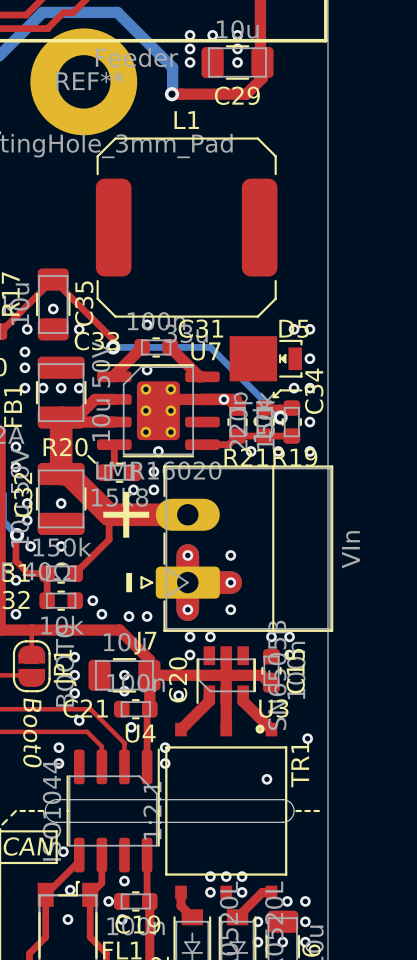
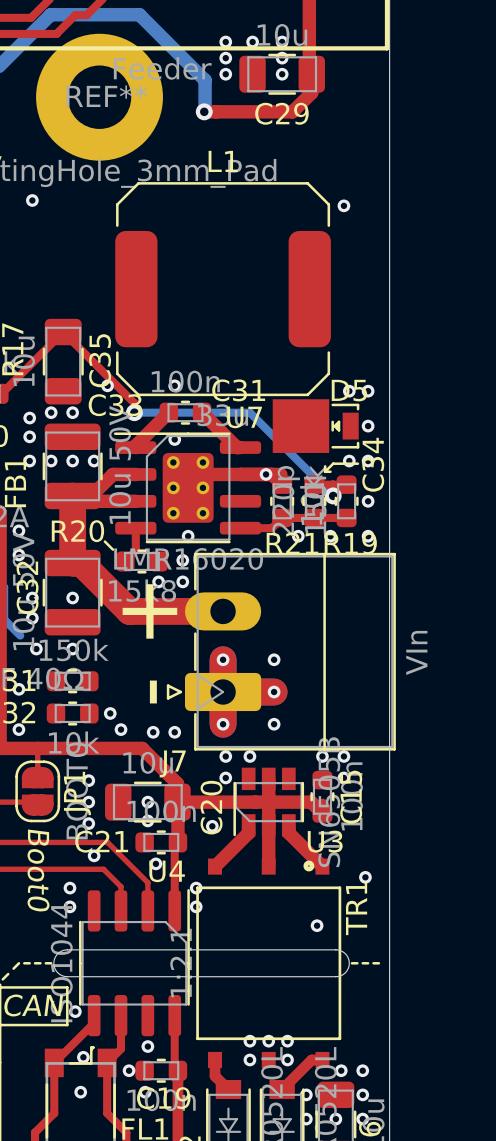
via: none -> (32, 200)
via: none -> (343, 205)
L1 position: (186, 227) -> (223, 289)
via: (53, 308) -> none
via: (27, 329) -> none
via position: (79, 329) -> (107, 385)
via: none -> (51, 412)
via: none -> (72, 412)
top track: (109, 514) (109, 539) (75, 573) -> none
top track: (17, 535) (15, 561) (28, 573) (47, 573) (47, 600) -> none
via: (17, 535) -> none

